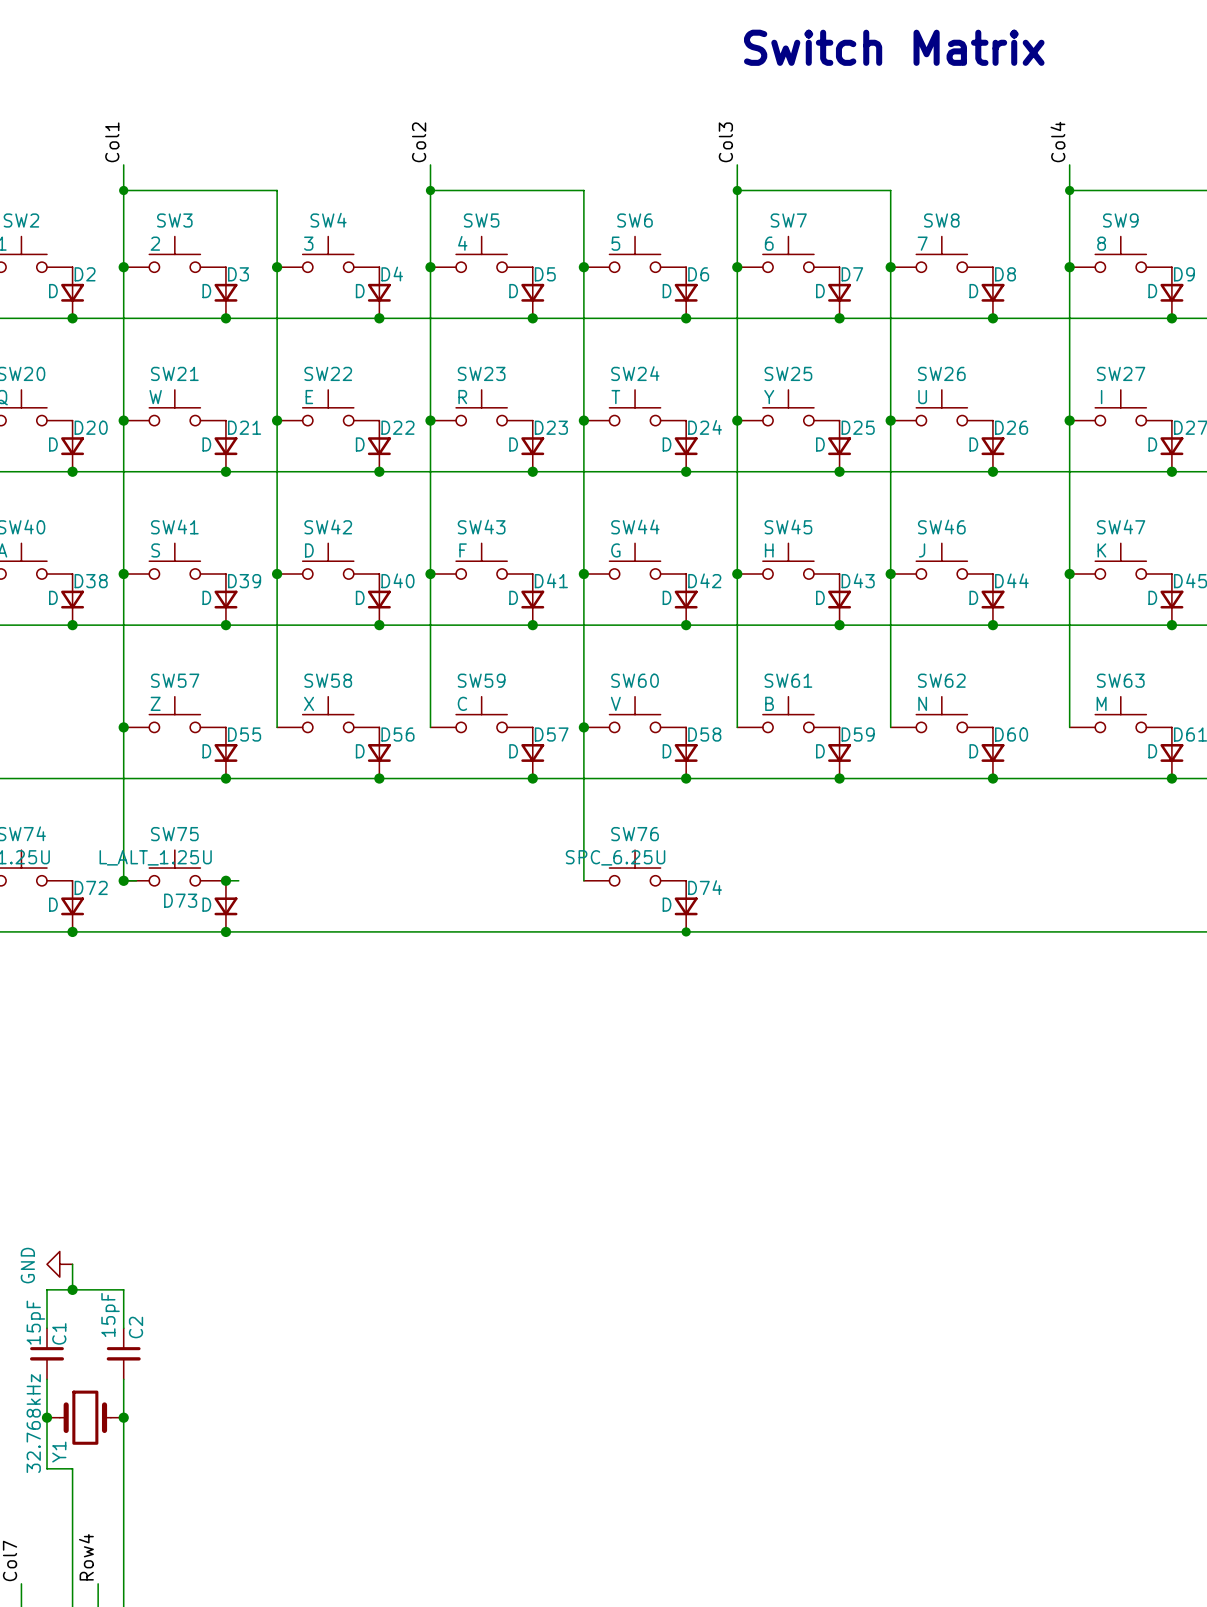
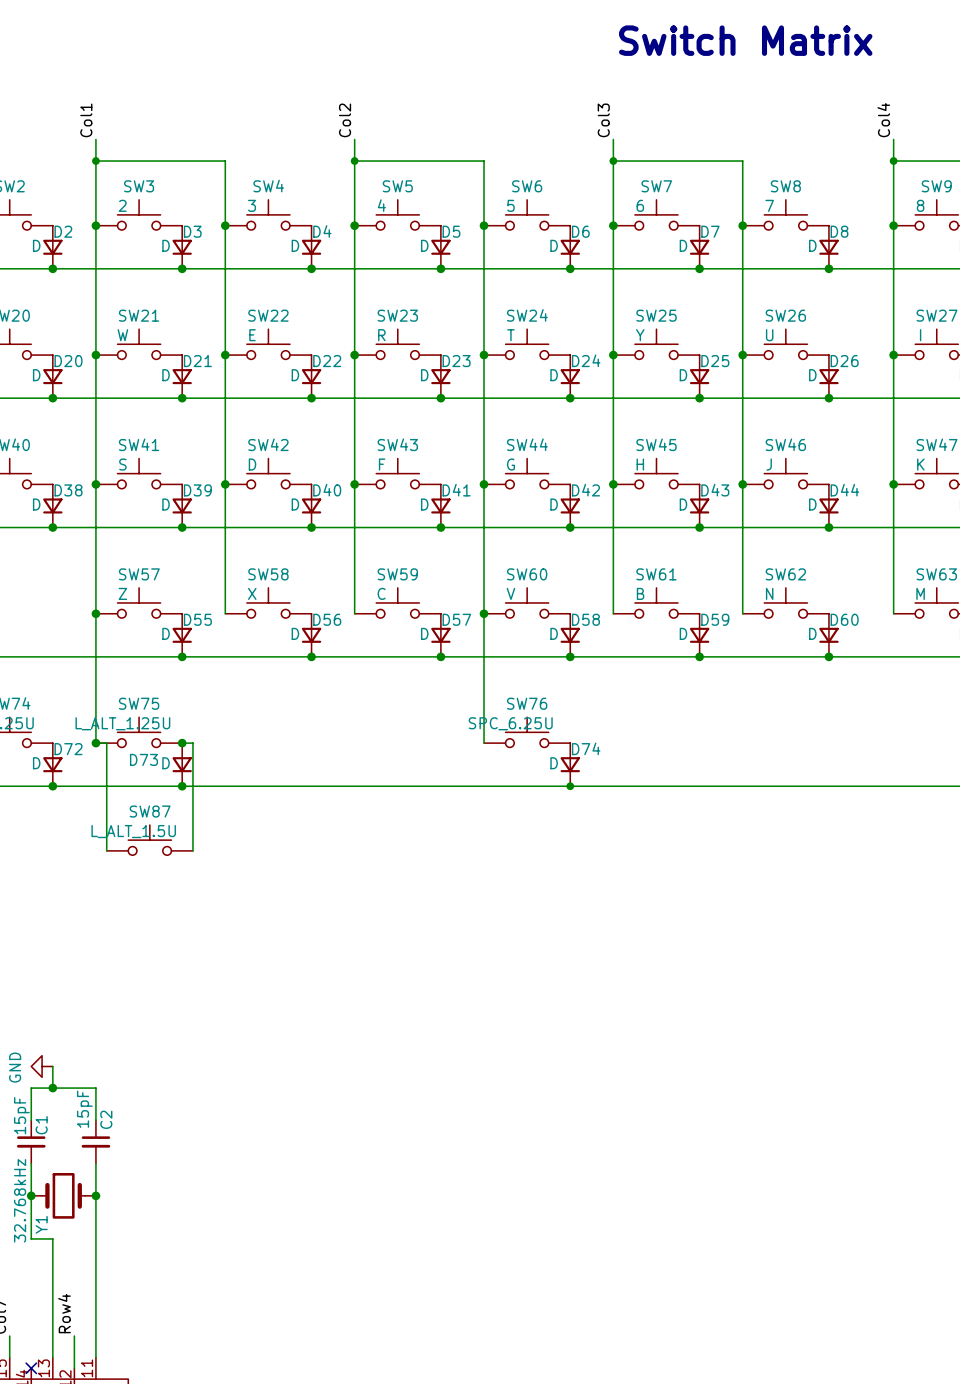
wire: none -> (106, 743) (106, 850)
wire: none -> (192, 743) (192, 850)
SW87: none -> L_ALT_1.5U (149, 840)

